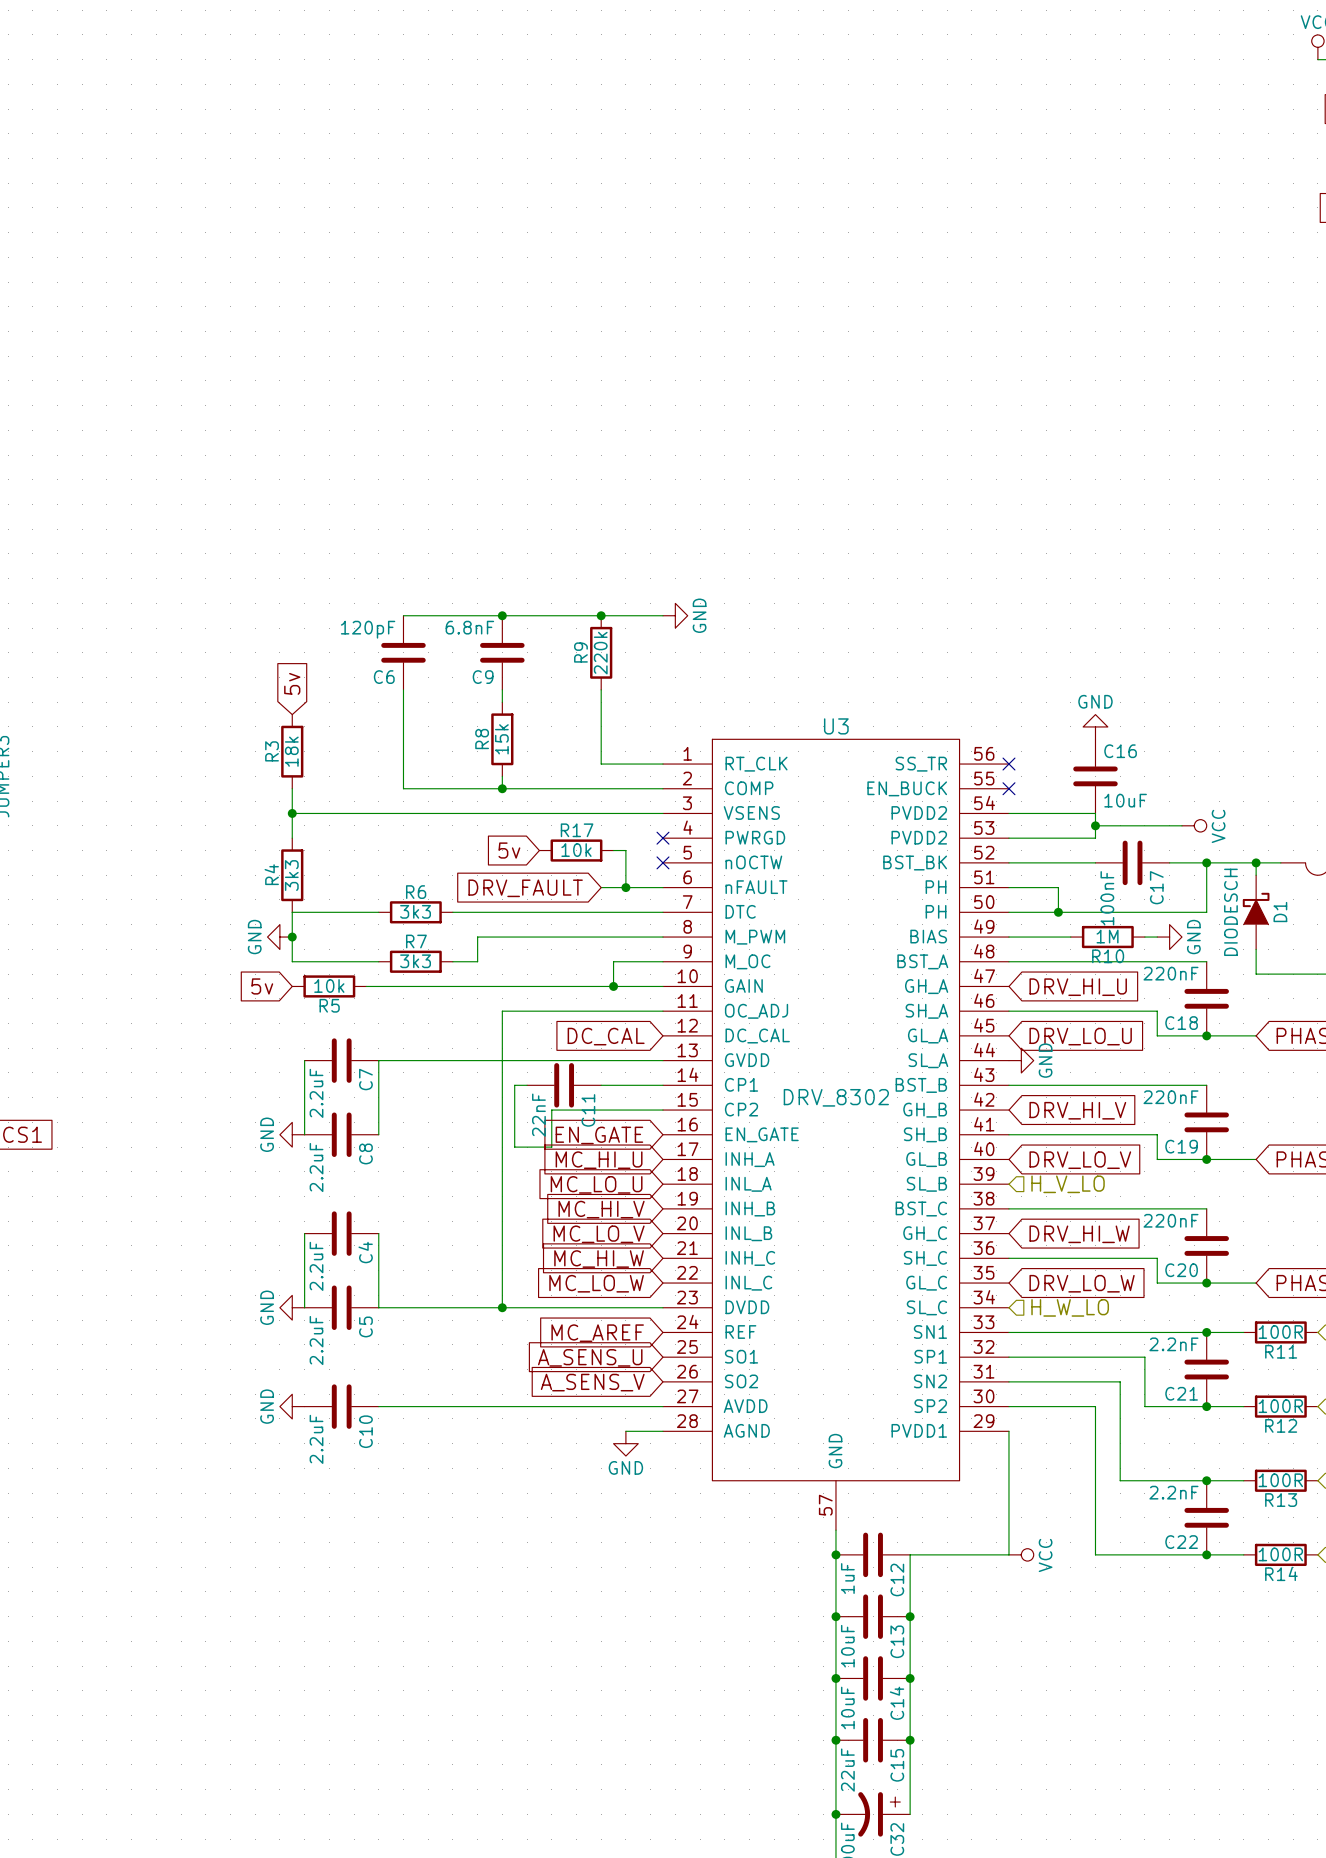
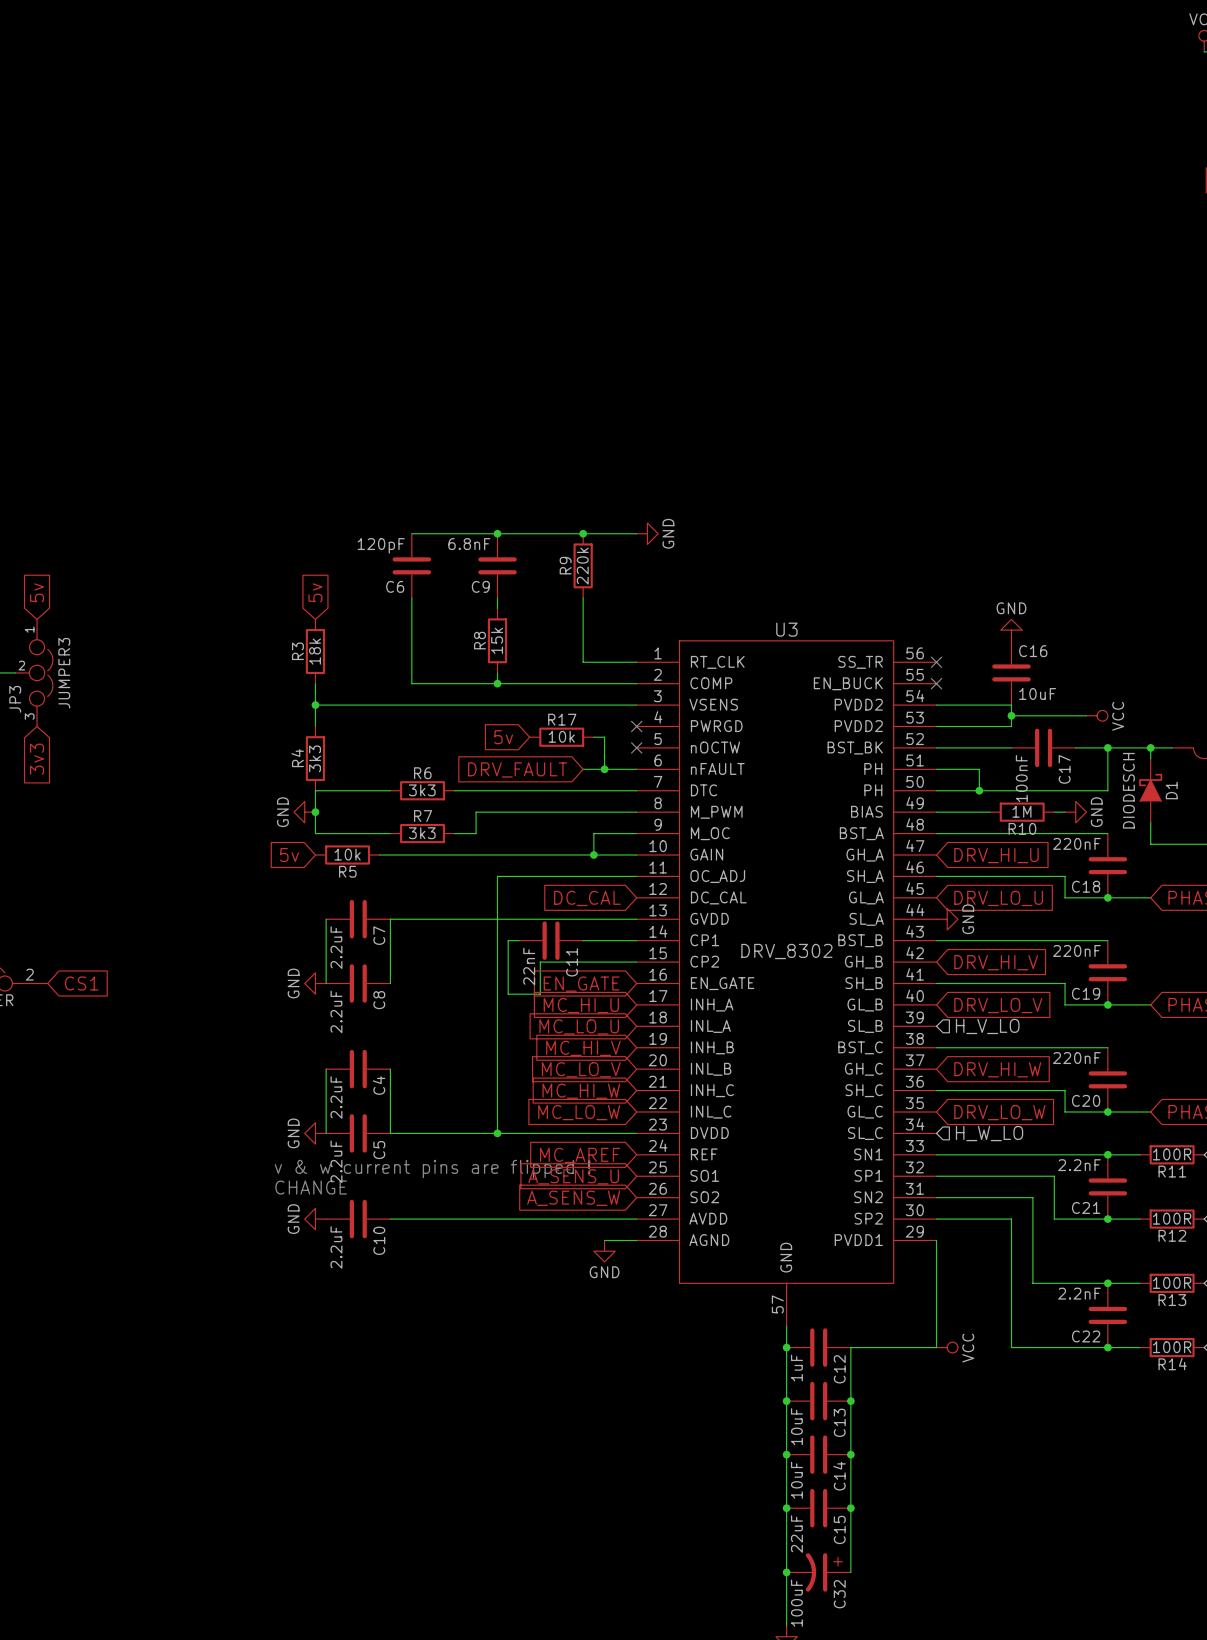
text: none -> v & w current pins are flipped ! (432, 1169)
text: none -> CHANGE (311, 1187)
global label: A_SENS_V (592, 1382) -> A_SENS_W (573, 1198)

